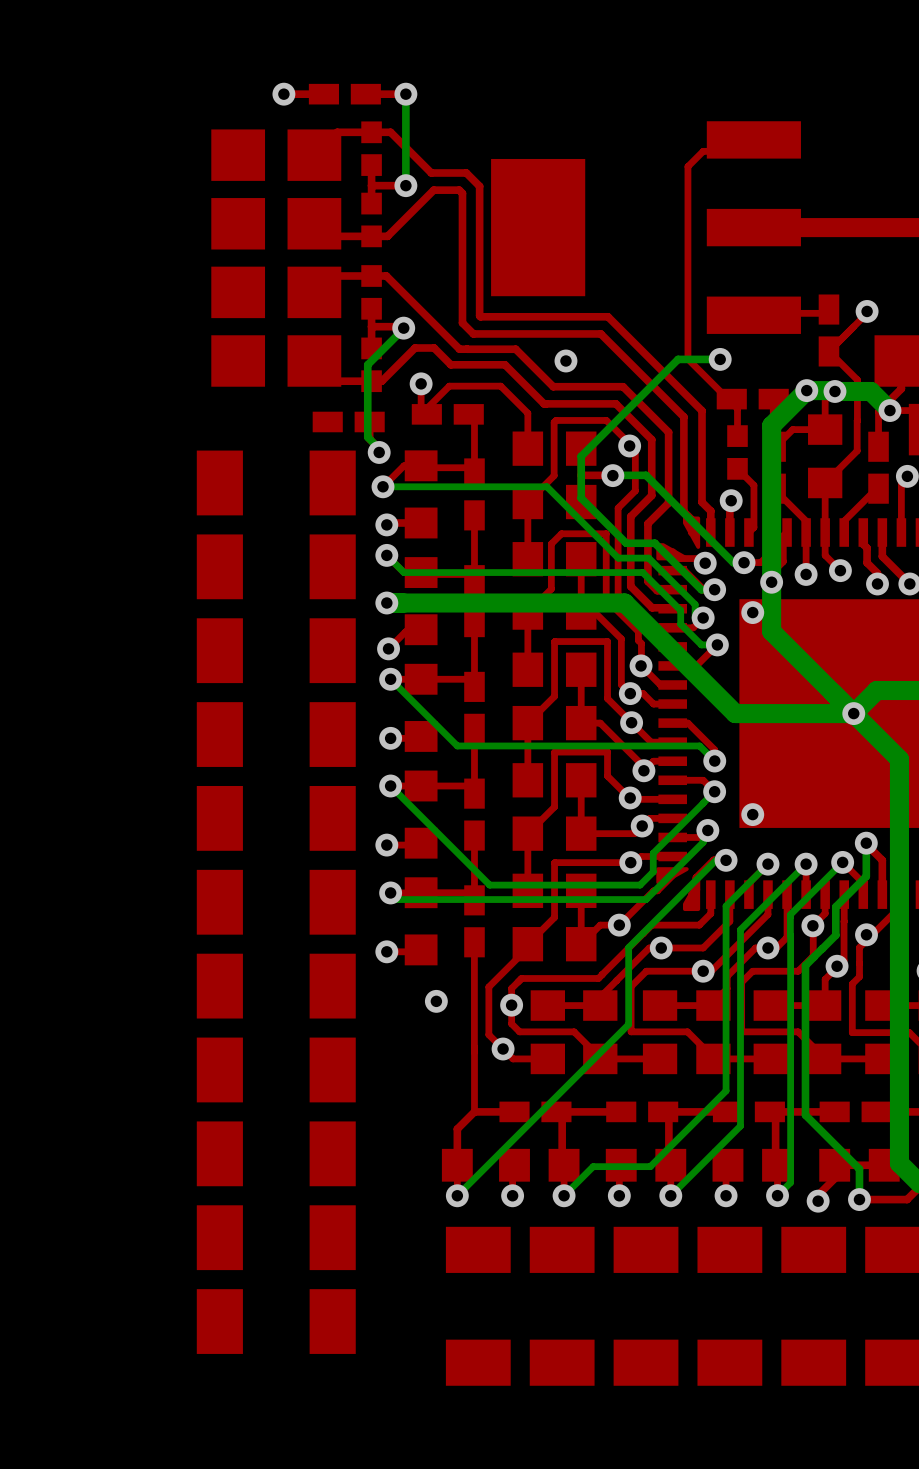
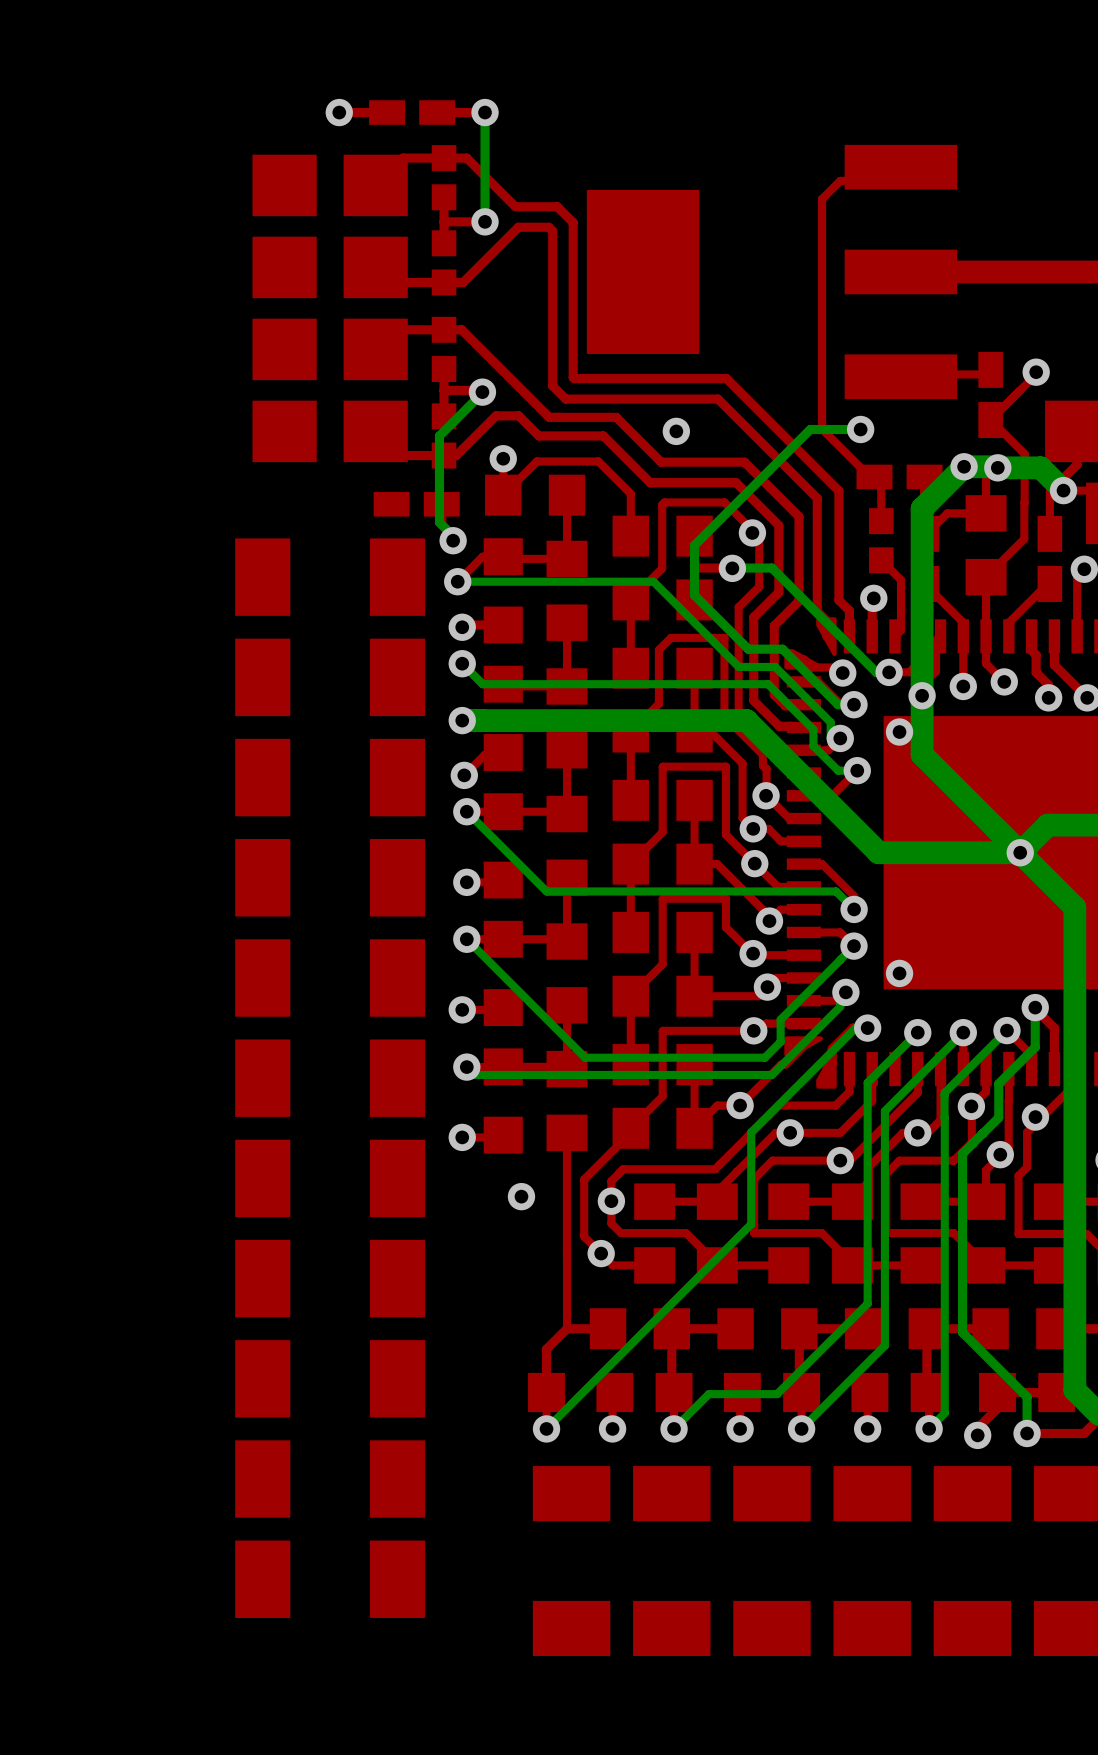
part footprint: [411, 404, 484, 425] -> [485, 474, 586, 516]
part footprint: [464, 458, 485, 531] -> [546, 540, 588, 641]
part footprint: [464, 565, 485, 638] -> [546, 668, 588, 769]
part footprint: [464, 671, 485, 744] -> [546, 795, 588, 897]
part footprint: [464, 778, 485, 851] -> [546, 923, 588, 1024]
part footprint: [464, 885, 485, 958] -> [546, 1050, 588, 1152]
part footprint: [499, 1101, 572, 1123] -> [589, 1308, 691, 1350]
part footprint: [606, 1101, 679, 1123] -> [717, 1308, 818, 1350]
part footprint: [712, 1101, 785, 1123] -> [844, 1308, 946, 1350]
part footprint: [819, 1101, 892, 1123] -> [972, 1308, 1073, 1350]

